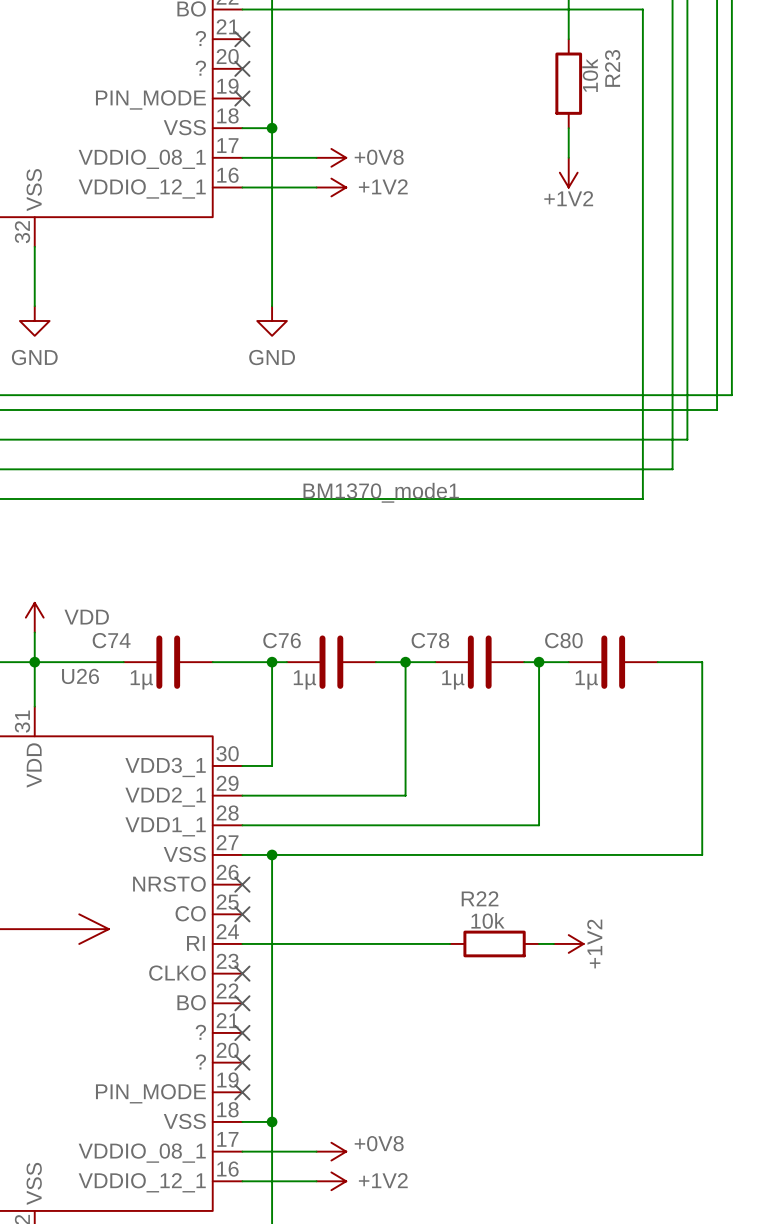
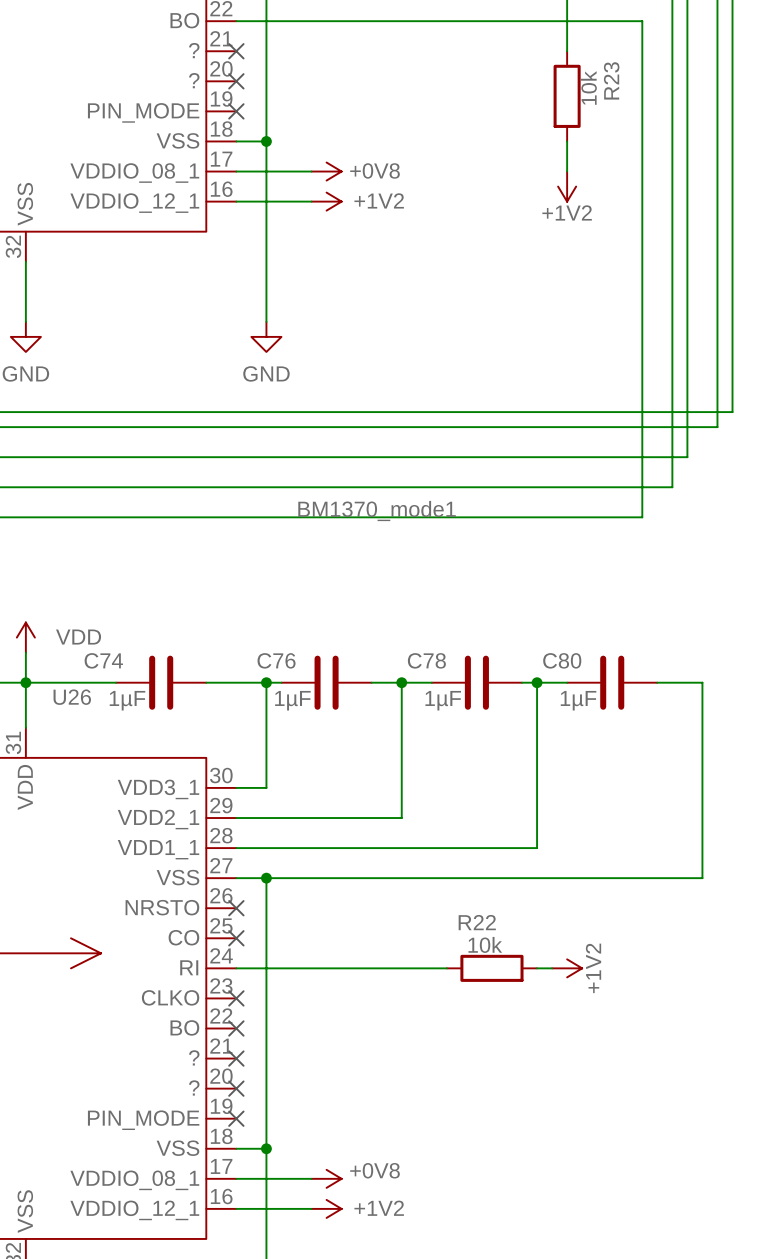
C74 value: 1µ (141, 679) -> 1µF (127, 700)
C76 value: 1µ (304, 679) -> 1µF (292, 700)
C78 value: 1µ (453, 679) -> 1µF (443, 700)
C80 value: 1µ (586, 679) -> 1µF (578, 700)

